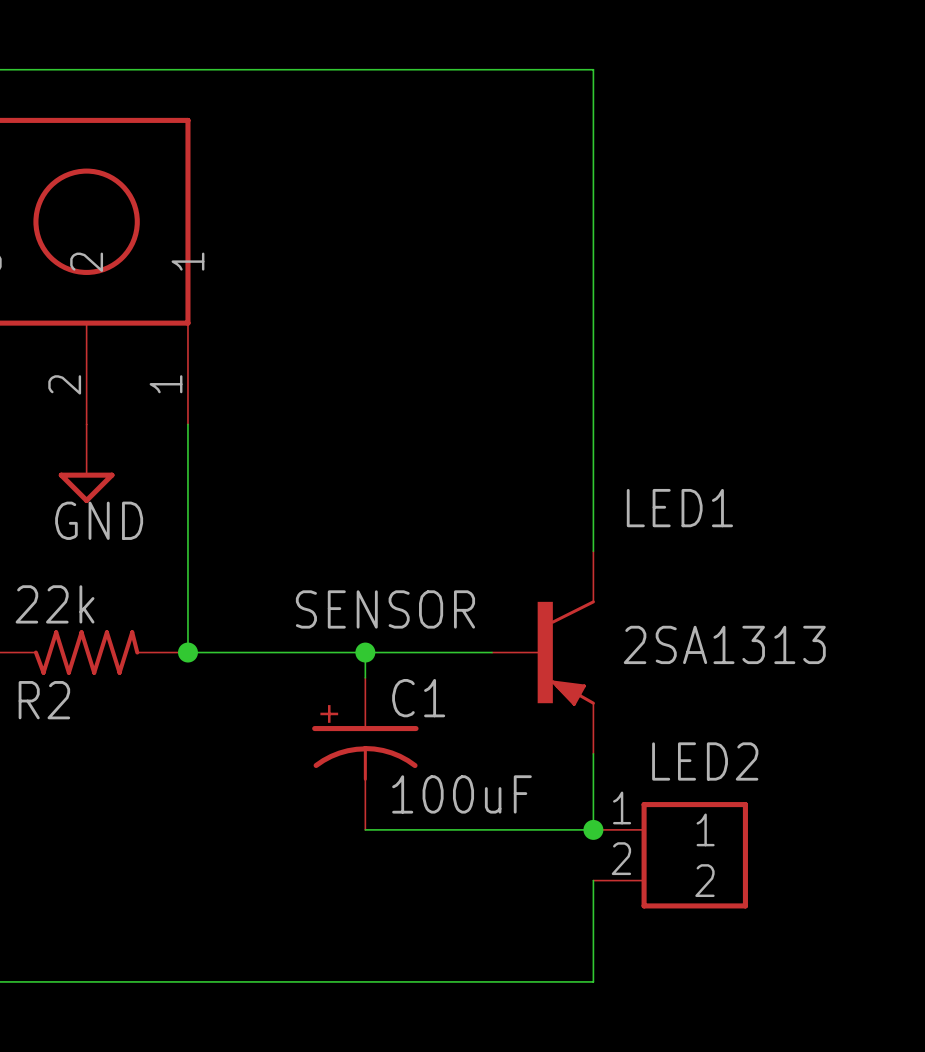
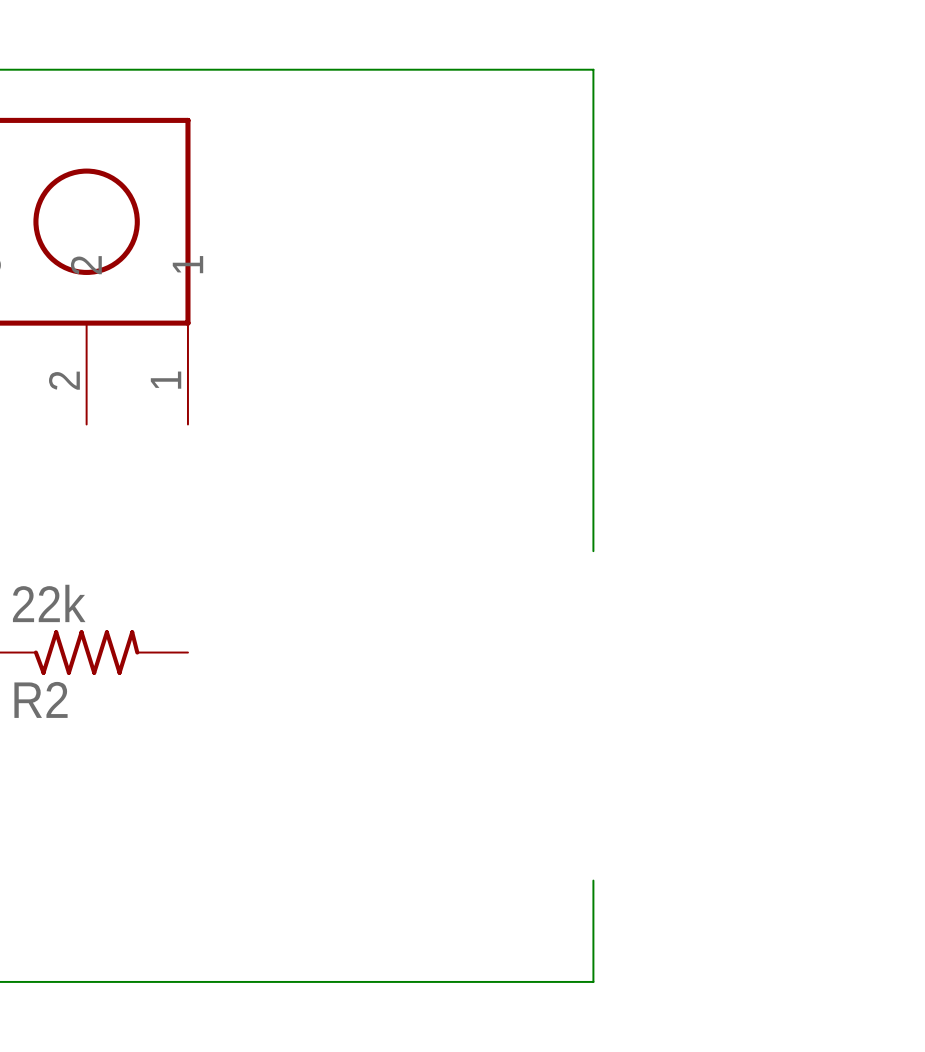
wire: (187, 424) (187, 652) (492, 652) -> none
power symbol: GND (86, 463) -> none
label: LED1 (679, 508) -> none
label: SENSOR (385, 609) -> none
junction: (187, 652) -> none
wire: (365, 652) (365, 677) -> none
junction: (365, 652) -> none
part: 2SA1313 (543, 652) -> none
C1: 100uF (365, 753) -> none
wire: (593, 753) (593, 829) (365, 829) -> none
label: LED2 (705, 761) -> none
junction: (593, 829) -> none
part: (670, 855) -> none

